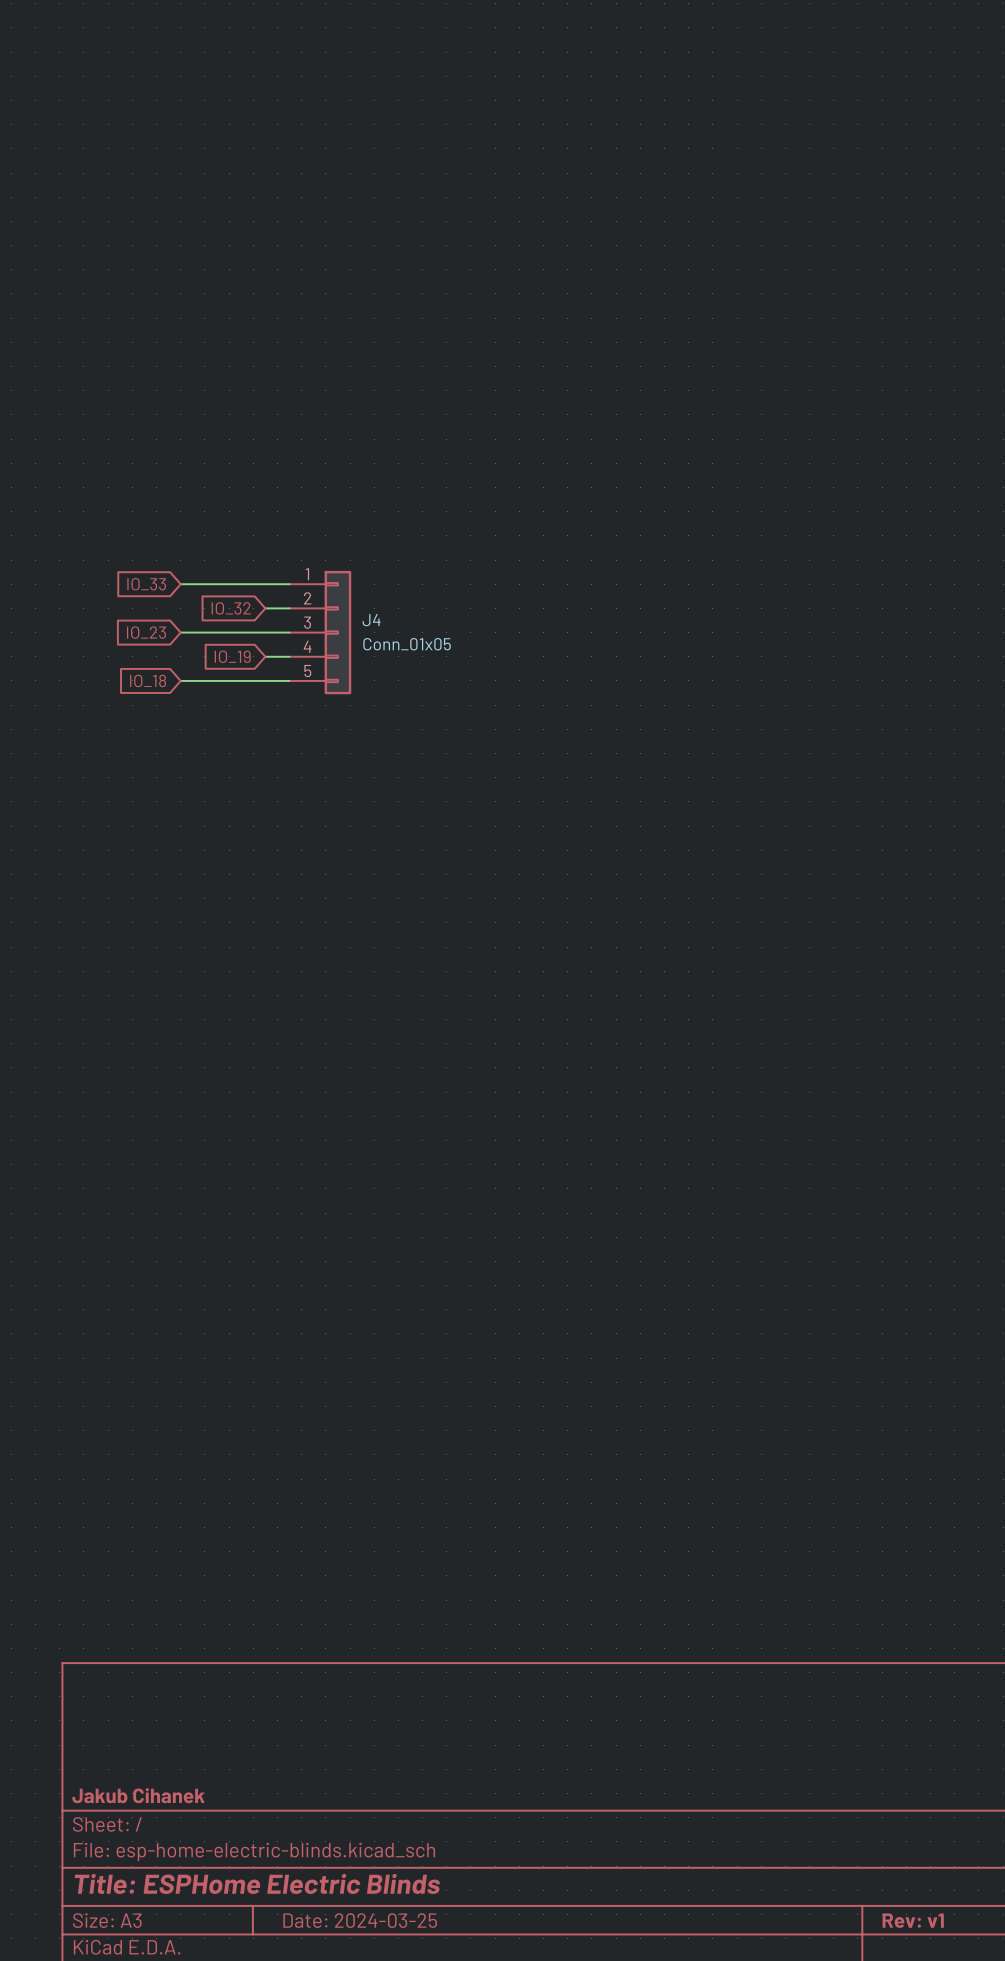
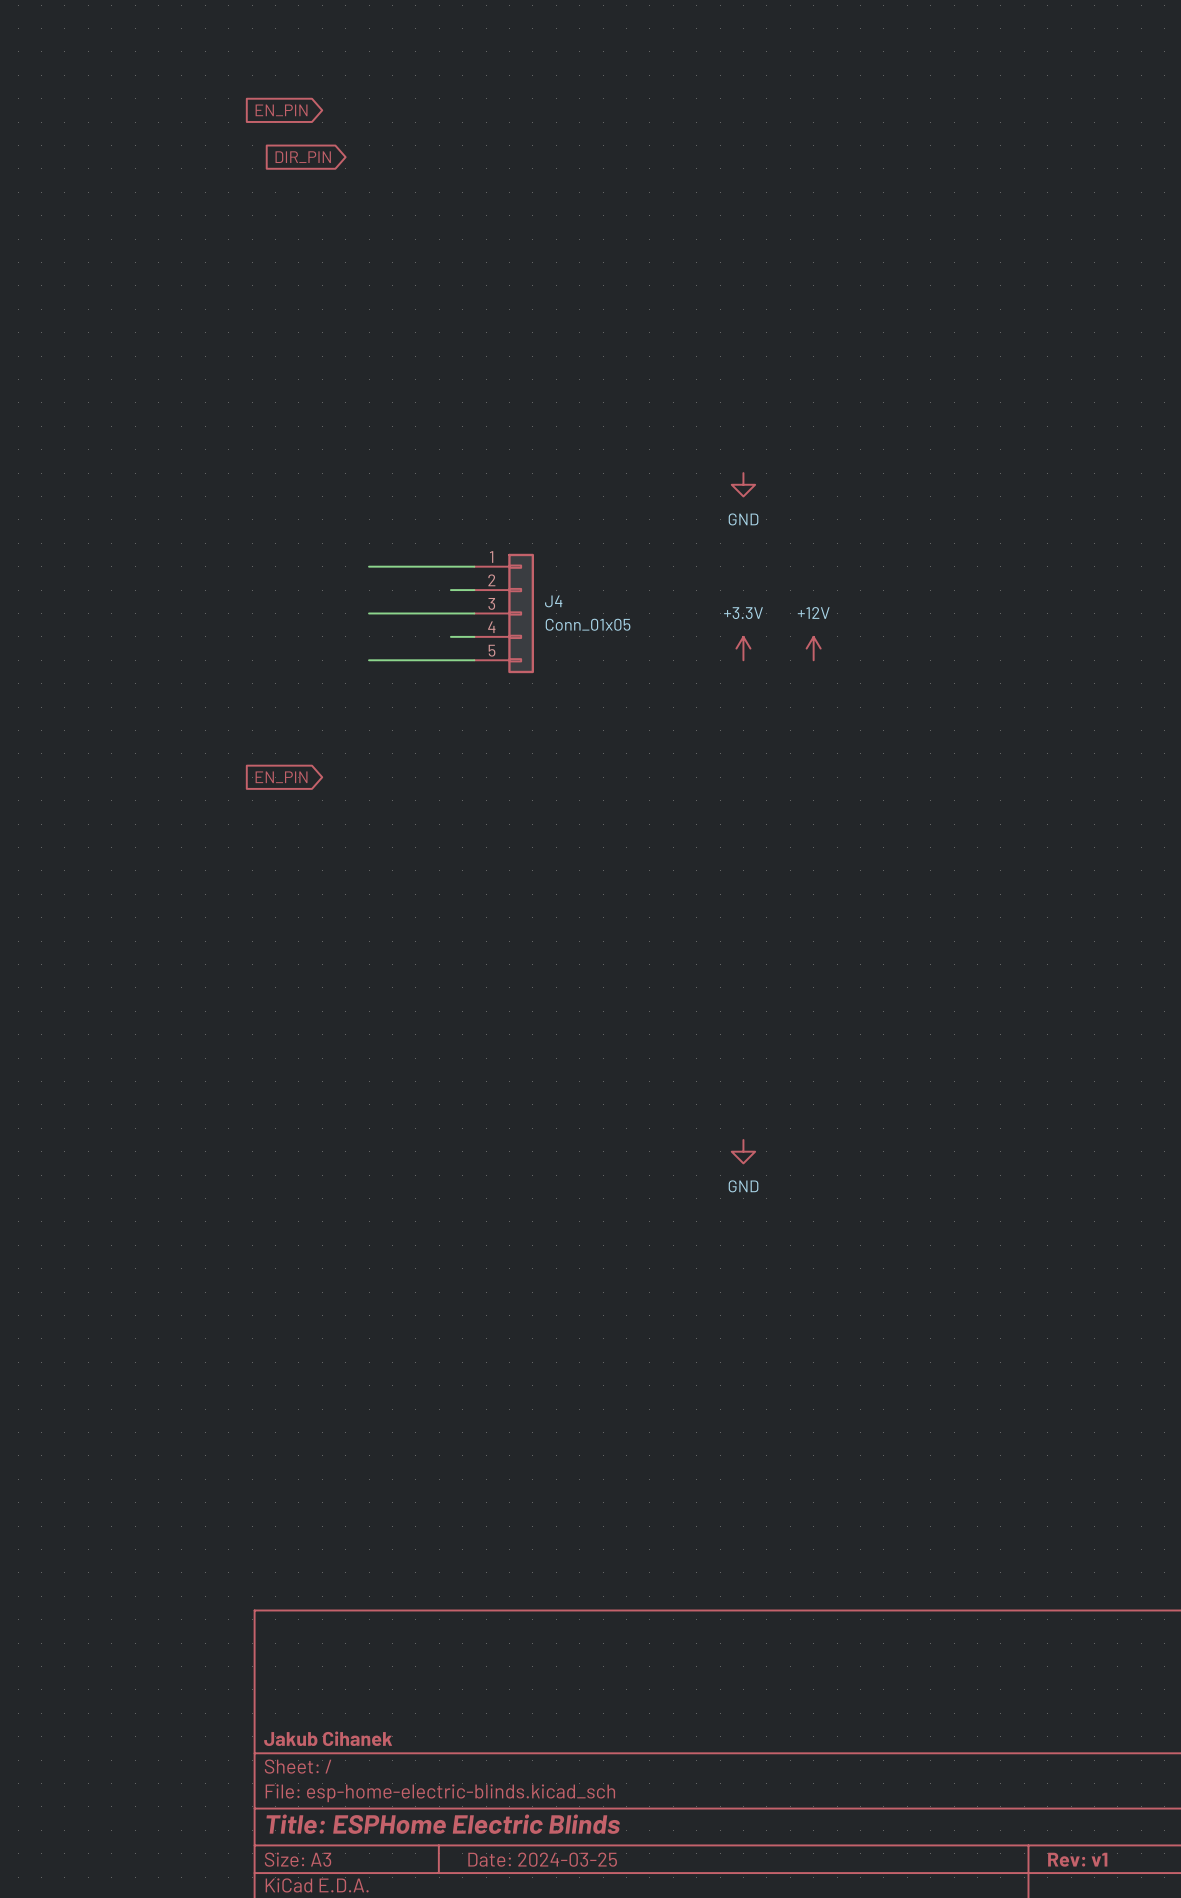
global label: none -> EN_PIN (281, 110)
global label: none -> DIR_PIN (303, 157)
power symbol: none -> GND (743, 484)
global label: IO_33 (146, 584) -> none
global label: IO_32 (231, 608) -> none
global label: IO_23 (146, 632) -> none
global label: IO_19 (232, 656) -> none
power symbol: none -> +3.3V (743, 648)
power symbol: none -> +12V (813, 648)
global label: IO_18 (148, 680) -> none
global label: none -> EN_PIN (281, 777)
power symbol: none -> GND (743, 1151)

